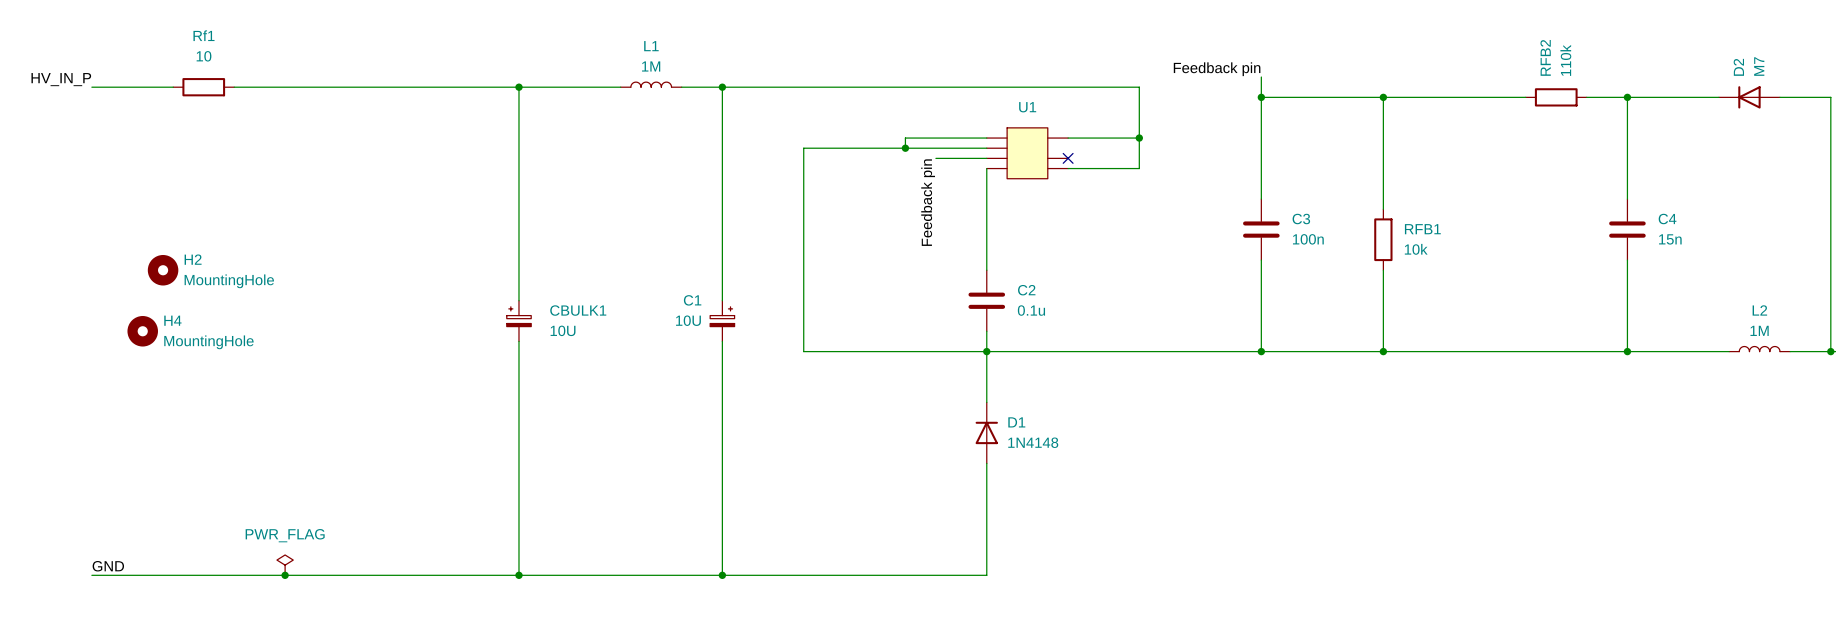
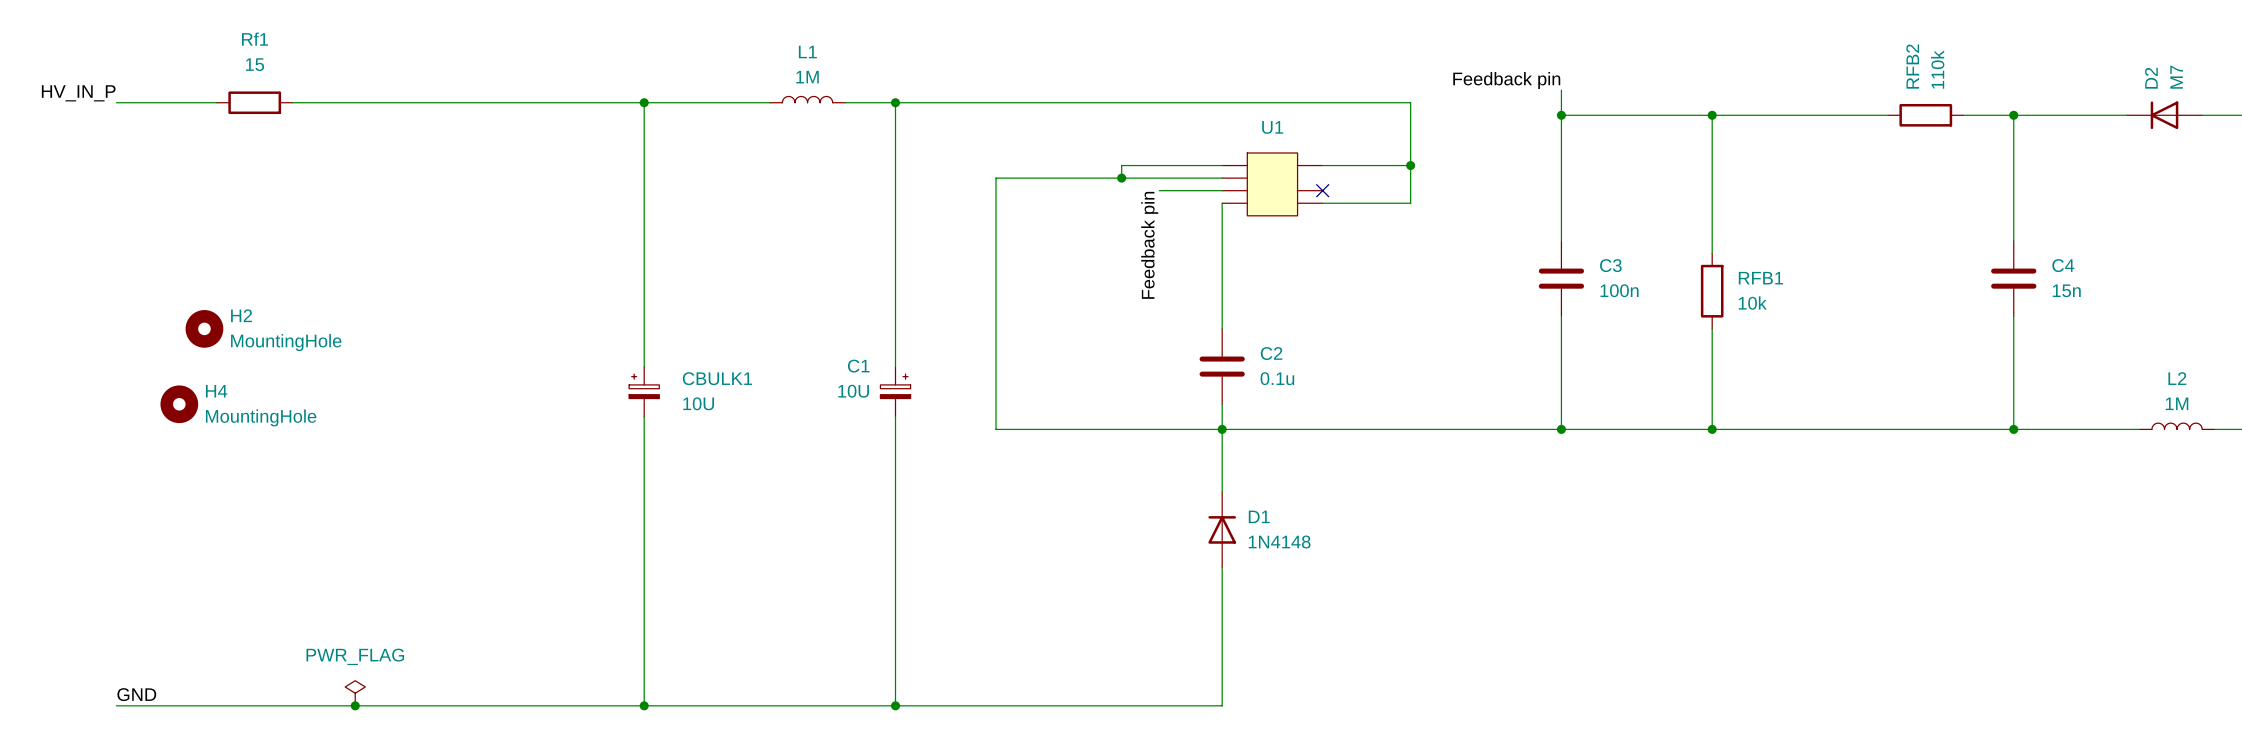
Rf1 value: 10 (204, 56) -> 15 (255, 64)

